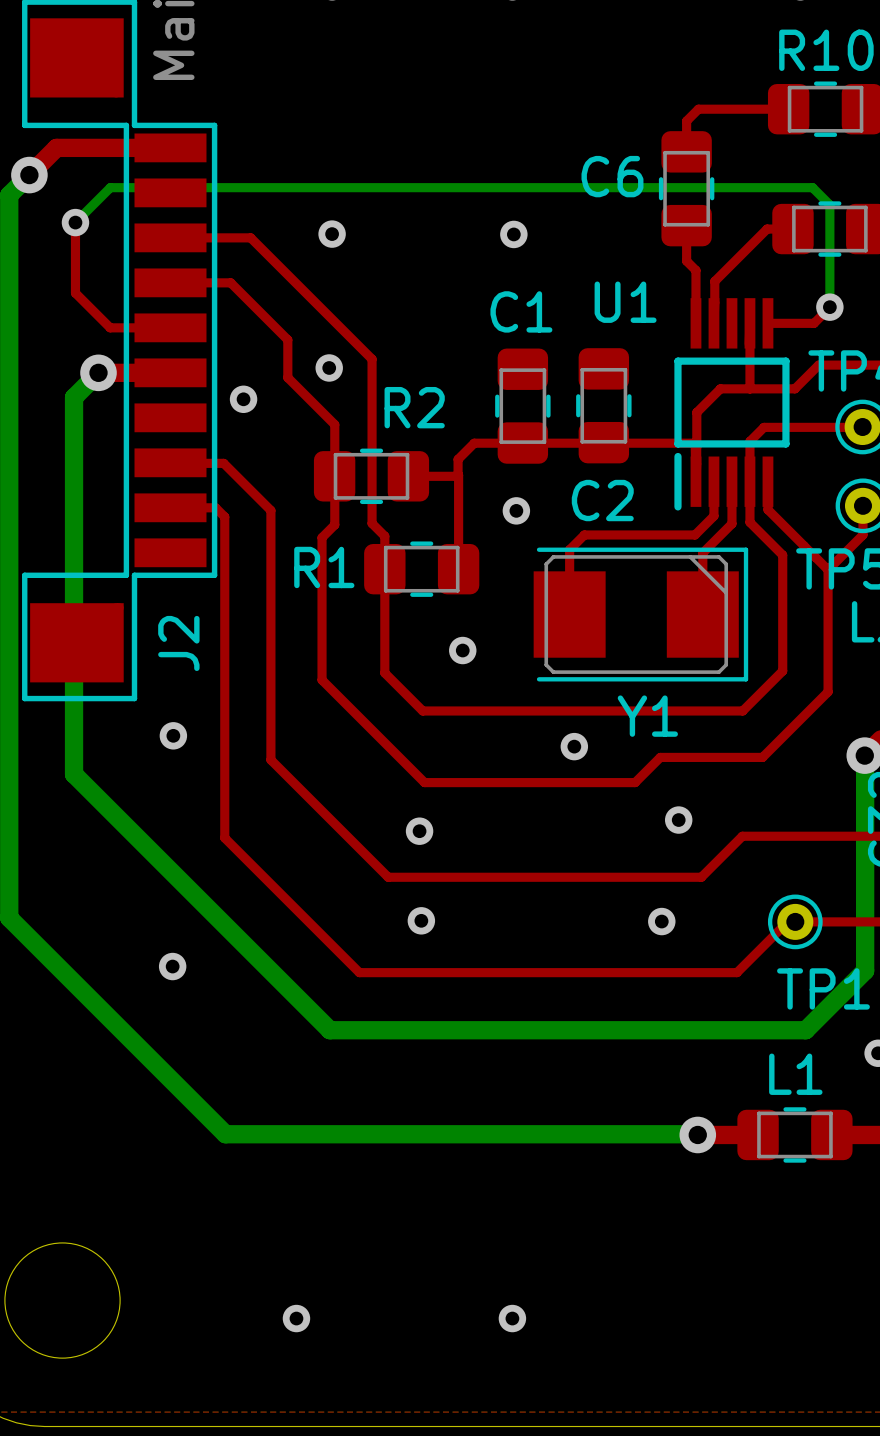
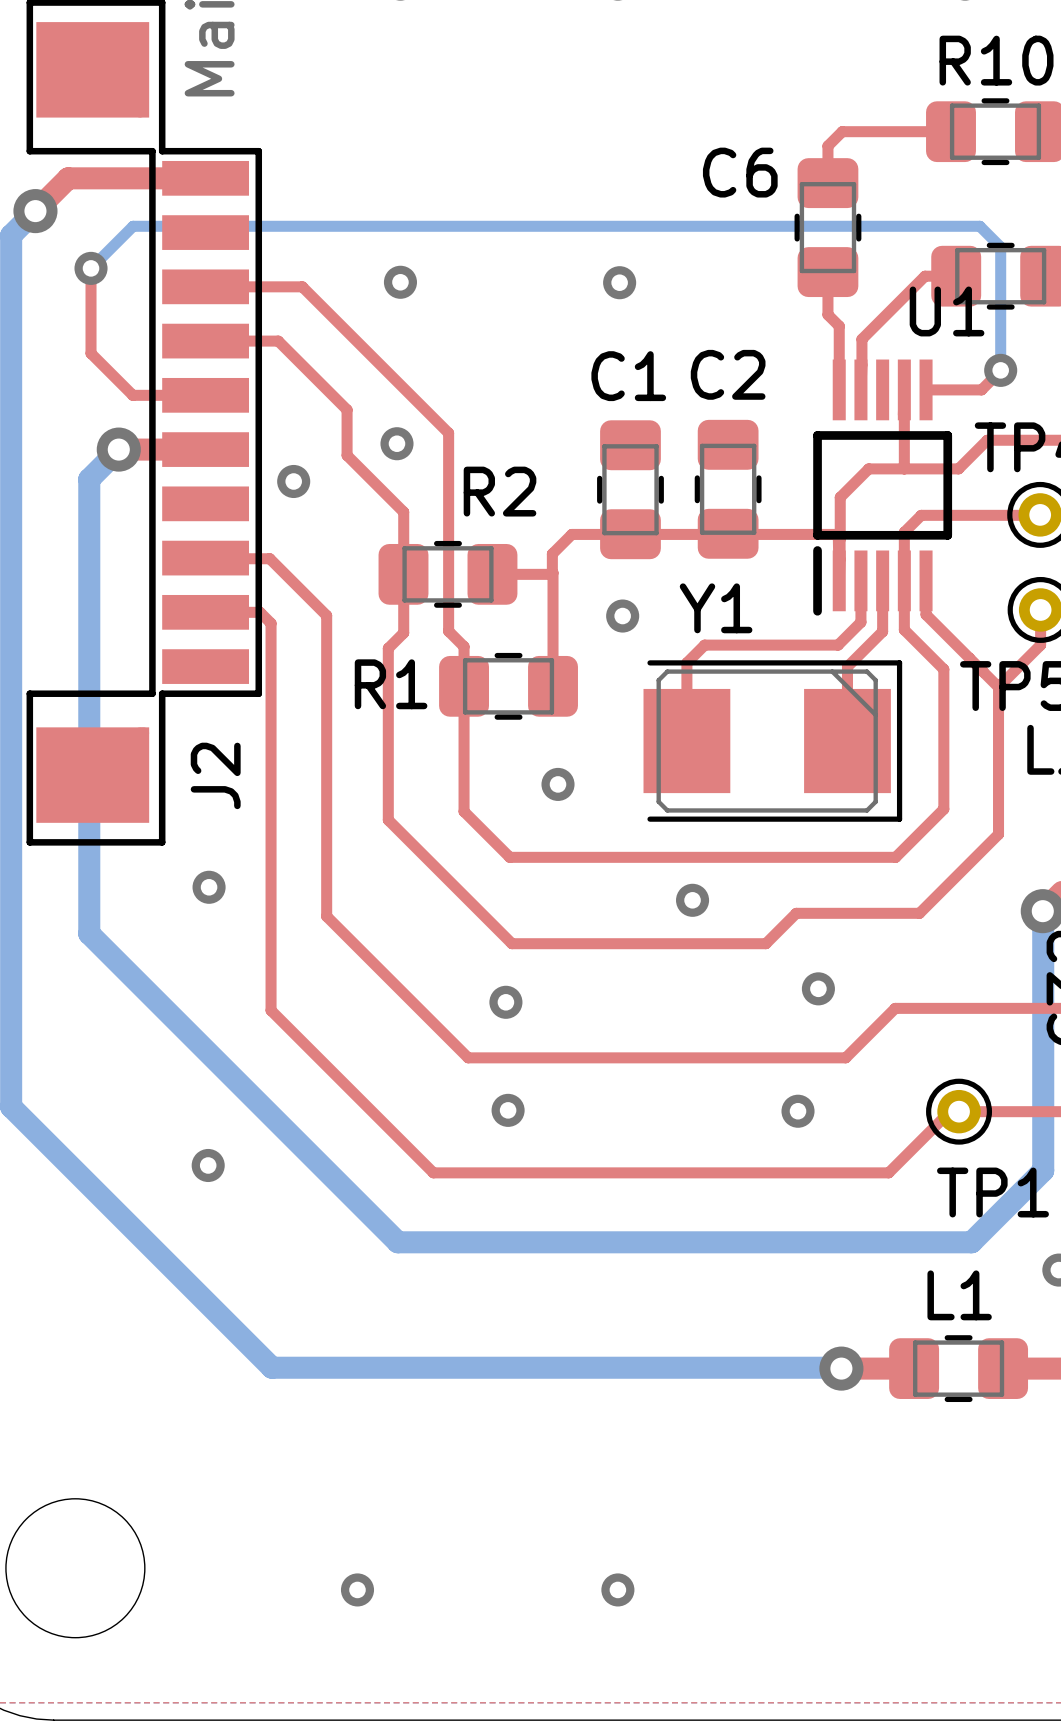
C6 name position: C6 (612, 176) -> C6 (740, 172)
U1 name position: U1 (625, 302) -> U1 (947, 311)
C2 name position: C2 (602, 500) -> C2 (728, 374)
Y1 name position: Y1 (647, 716) -> Y1 (716, 608)

